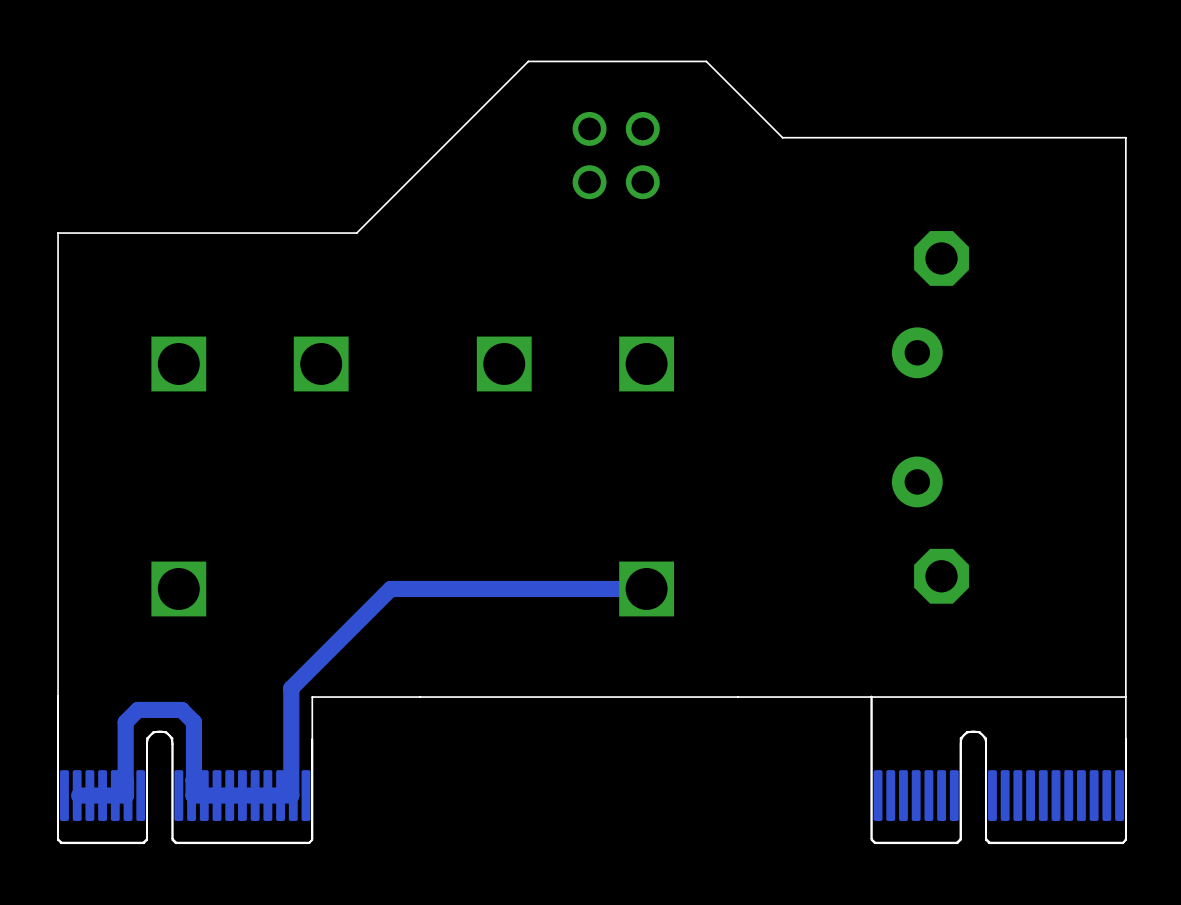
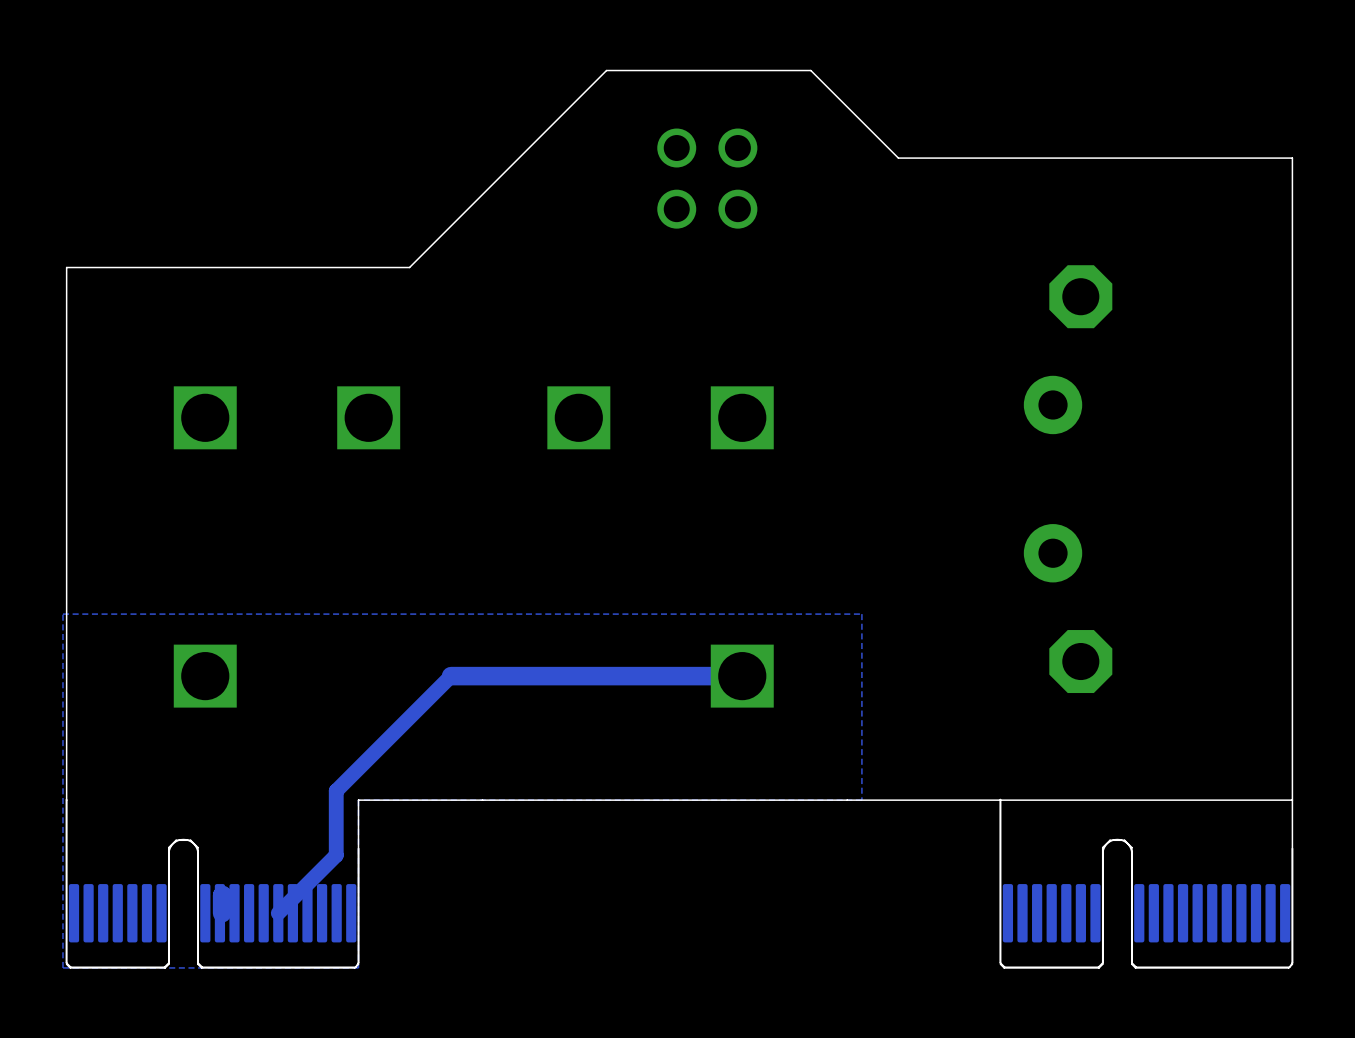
zone outline: none -> (861, 614) (861, 800) (358, 800) (358, 967) (62, 967) (62, 614) (861, 614)
track: (392, 588) (390, 588) (291, 688) (291, 795) (193, 795) -> (451, 676) (336, 790) (336, 855) (278, 913)
track: (193, 779) (193, 722) (181, 709) (137, 709) (125, 722) (126, 795) (79, 795) -> none

